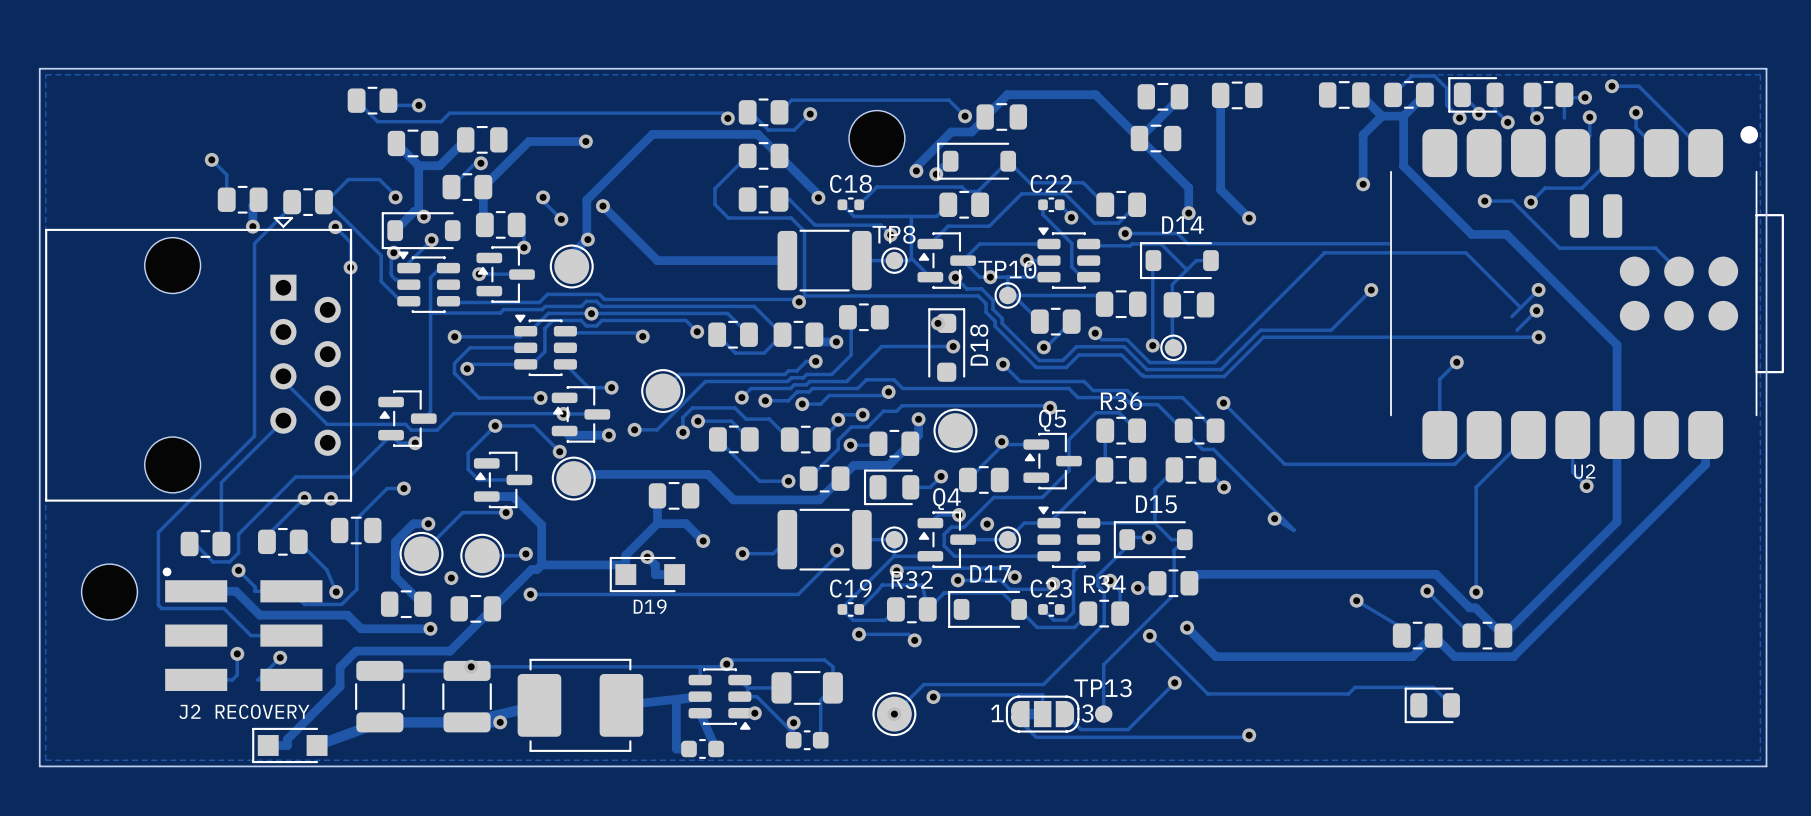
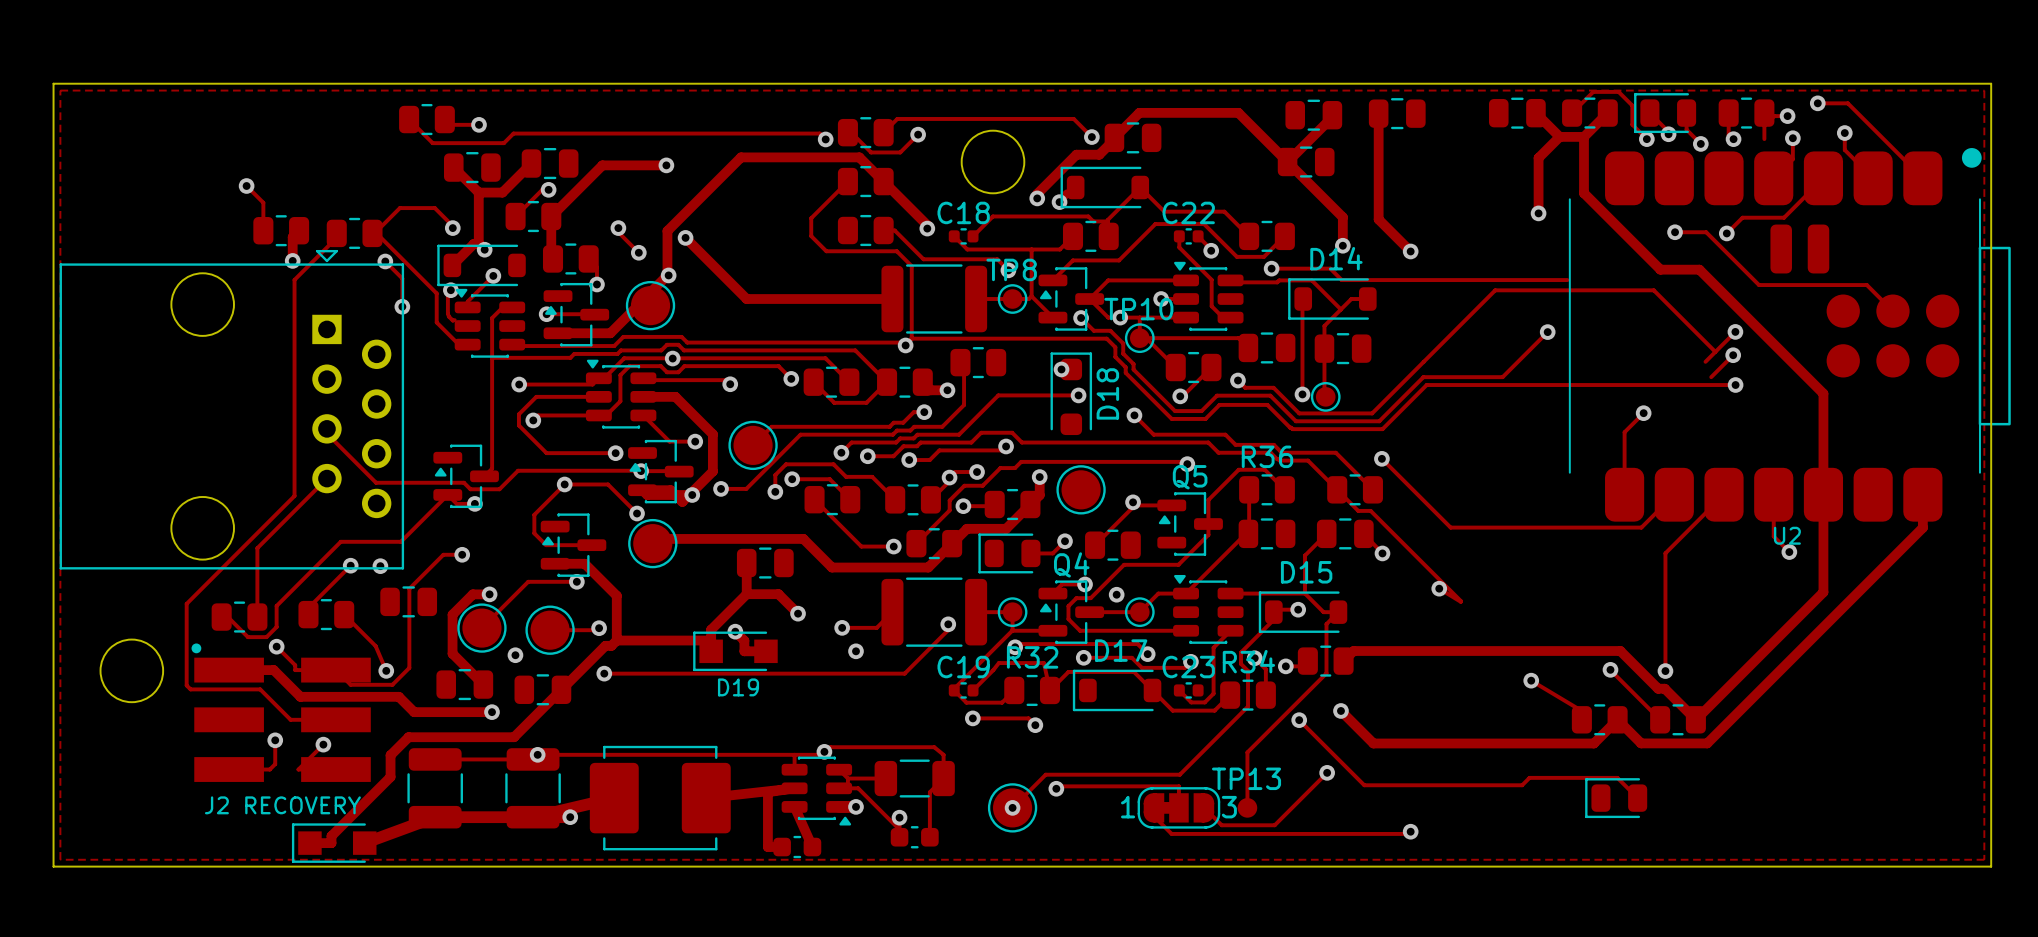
track: none -> (650, 305) (638, 305) (610, 333) (558, 333)
track: none -> (643, 396) (675, 396) (712, 434) (712, 471) (682, 501) (670, 490) (642, 490)
via: none -> (856, 651)

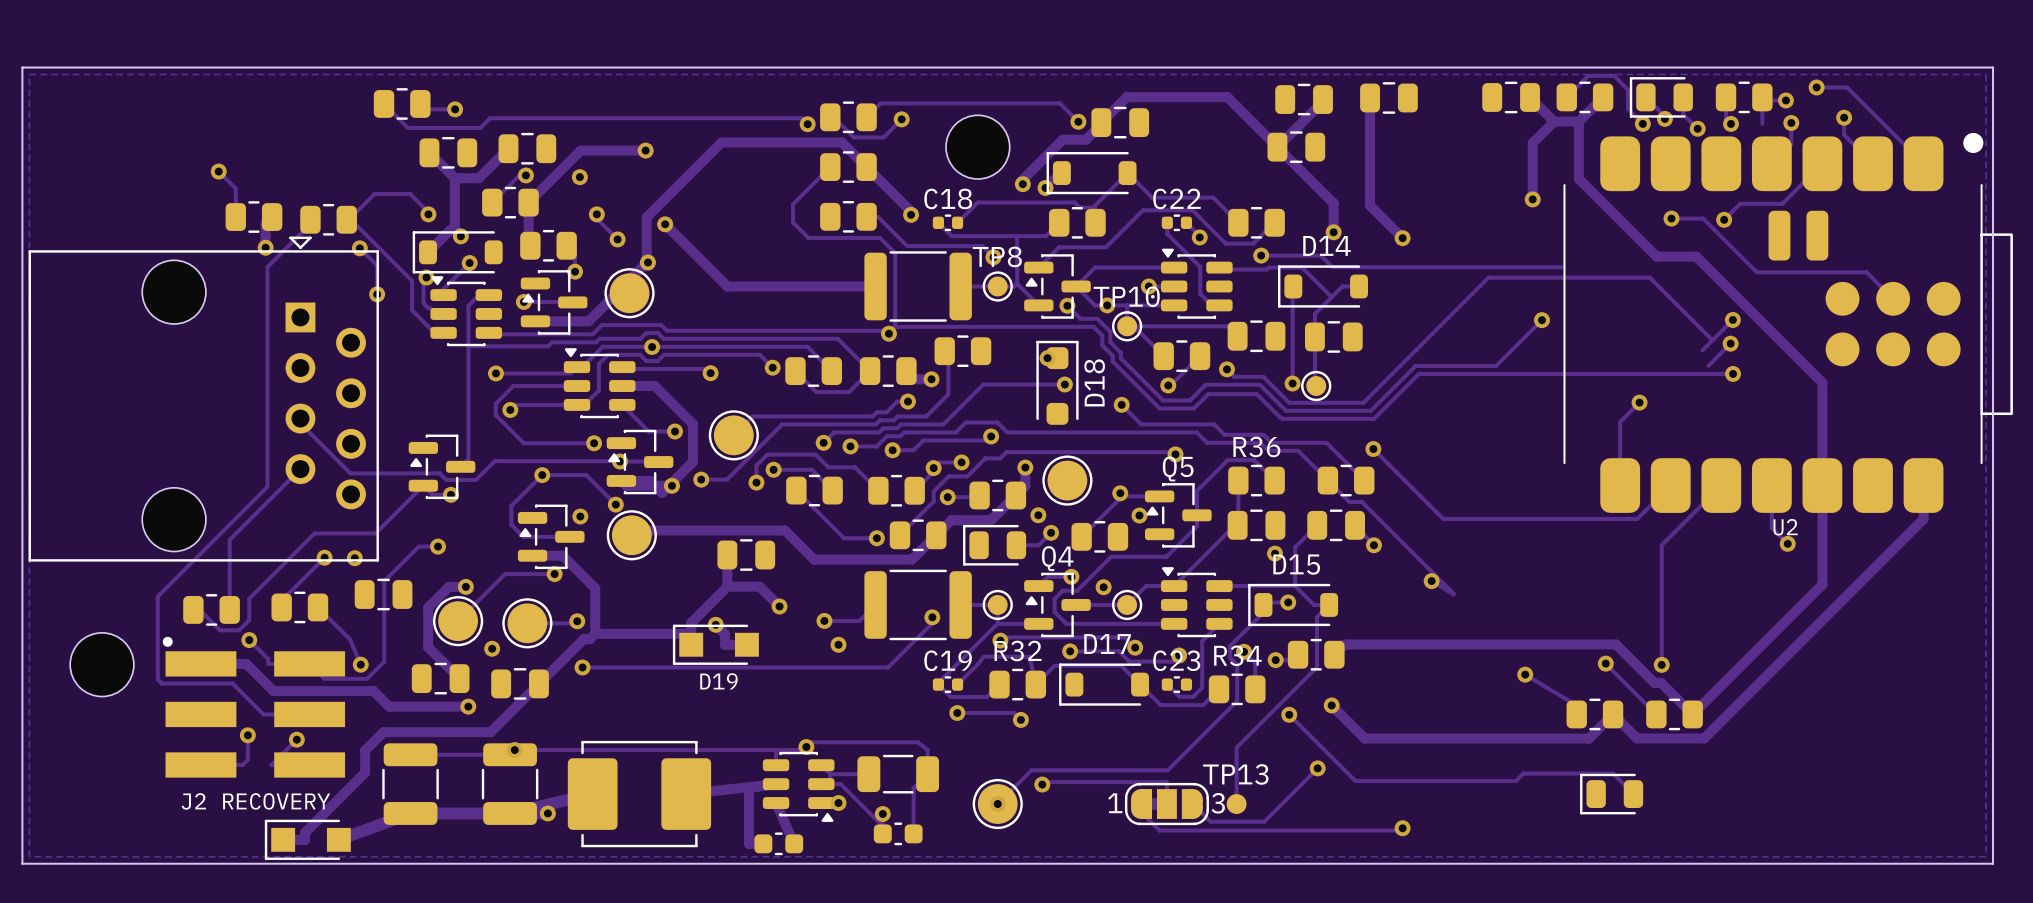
via: none -> (579, 177)
via: none -> (1038, 515)
via: none -> (1139, 515)
via: none -> (580, 516)
via: none -> (1275, 553)

